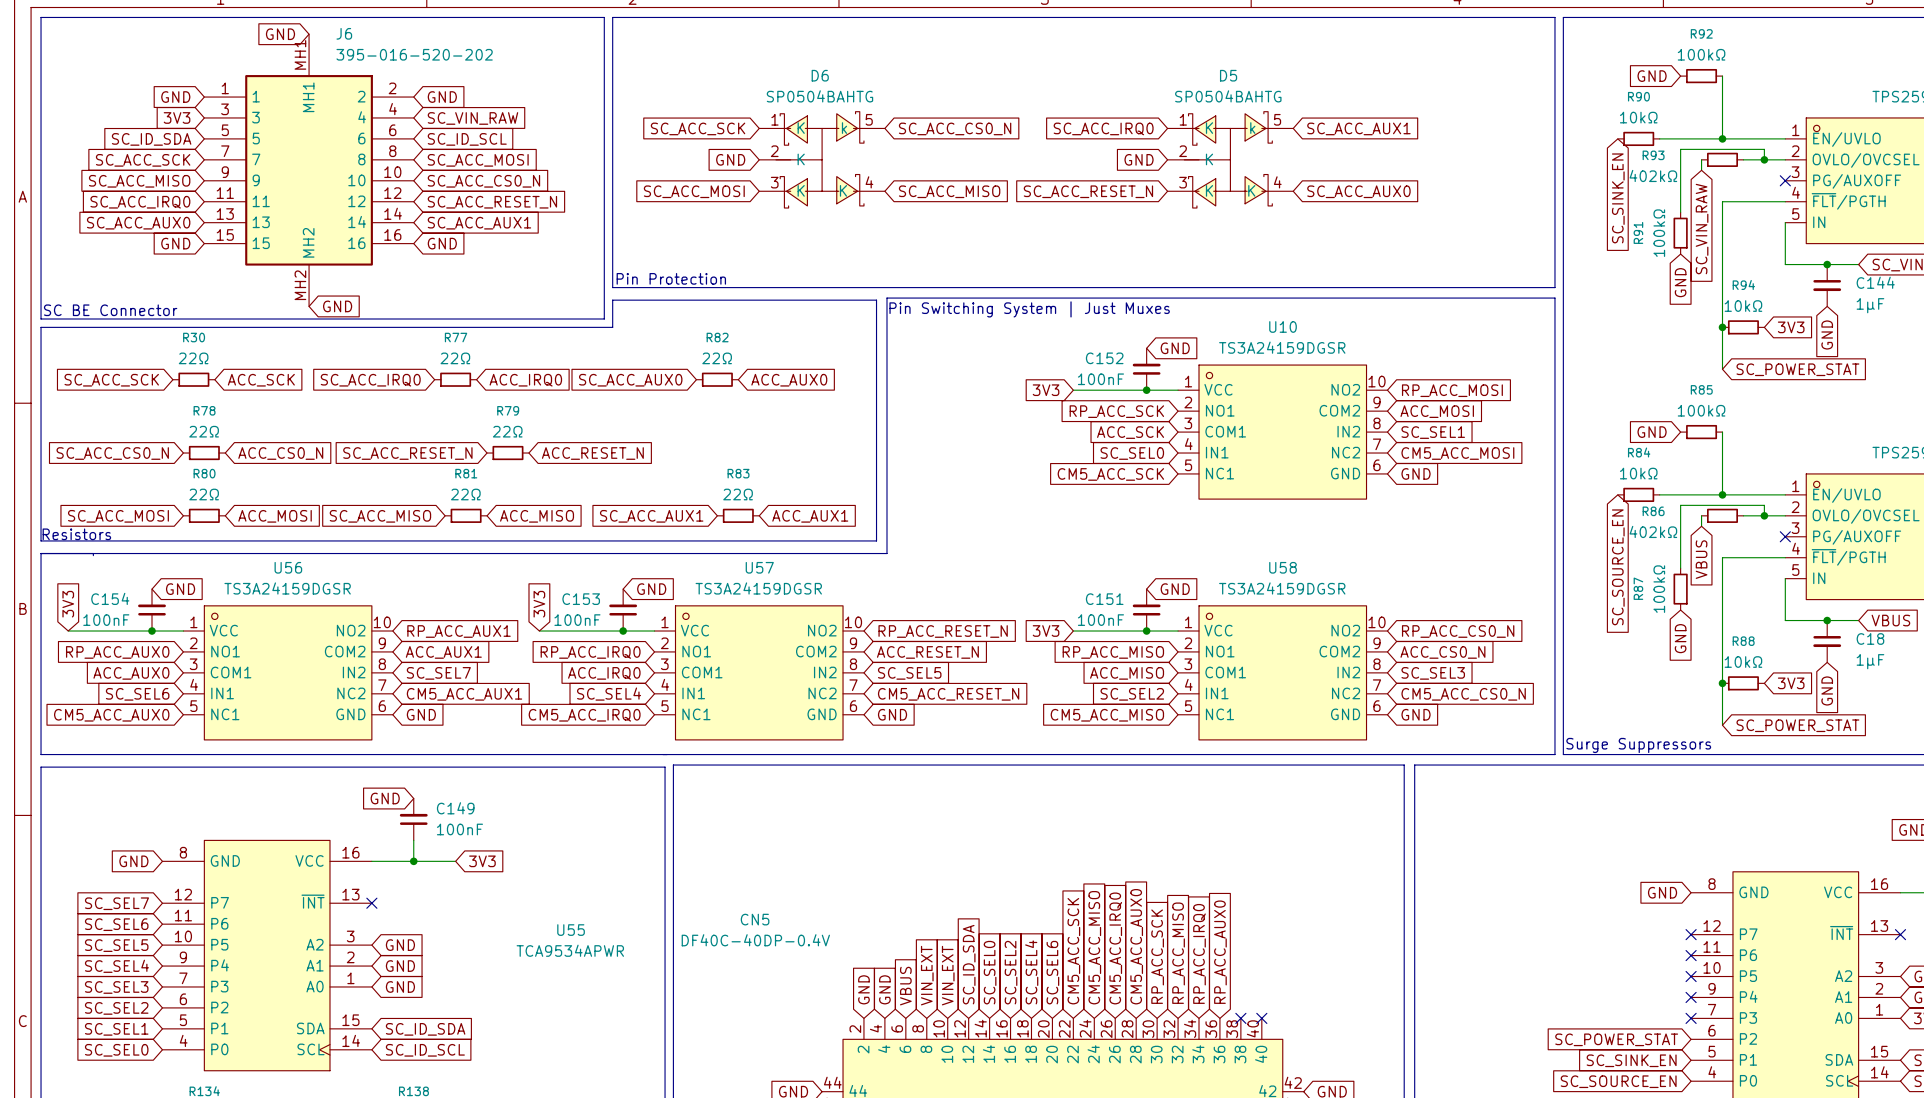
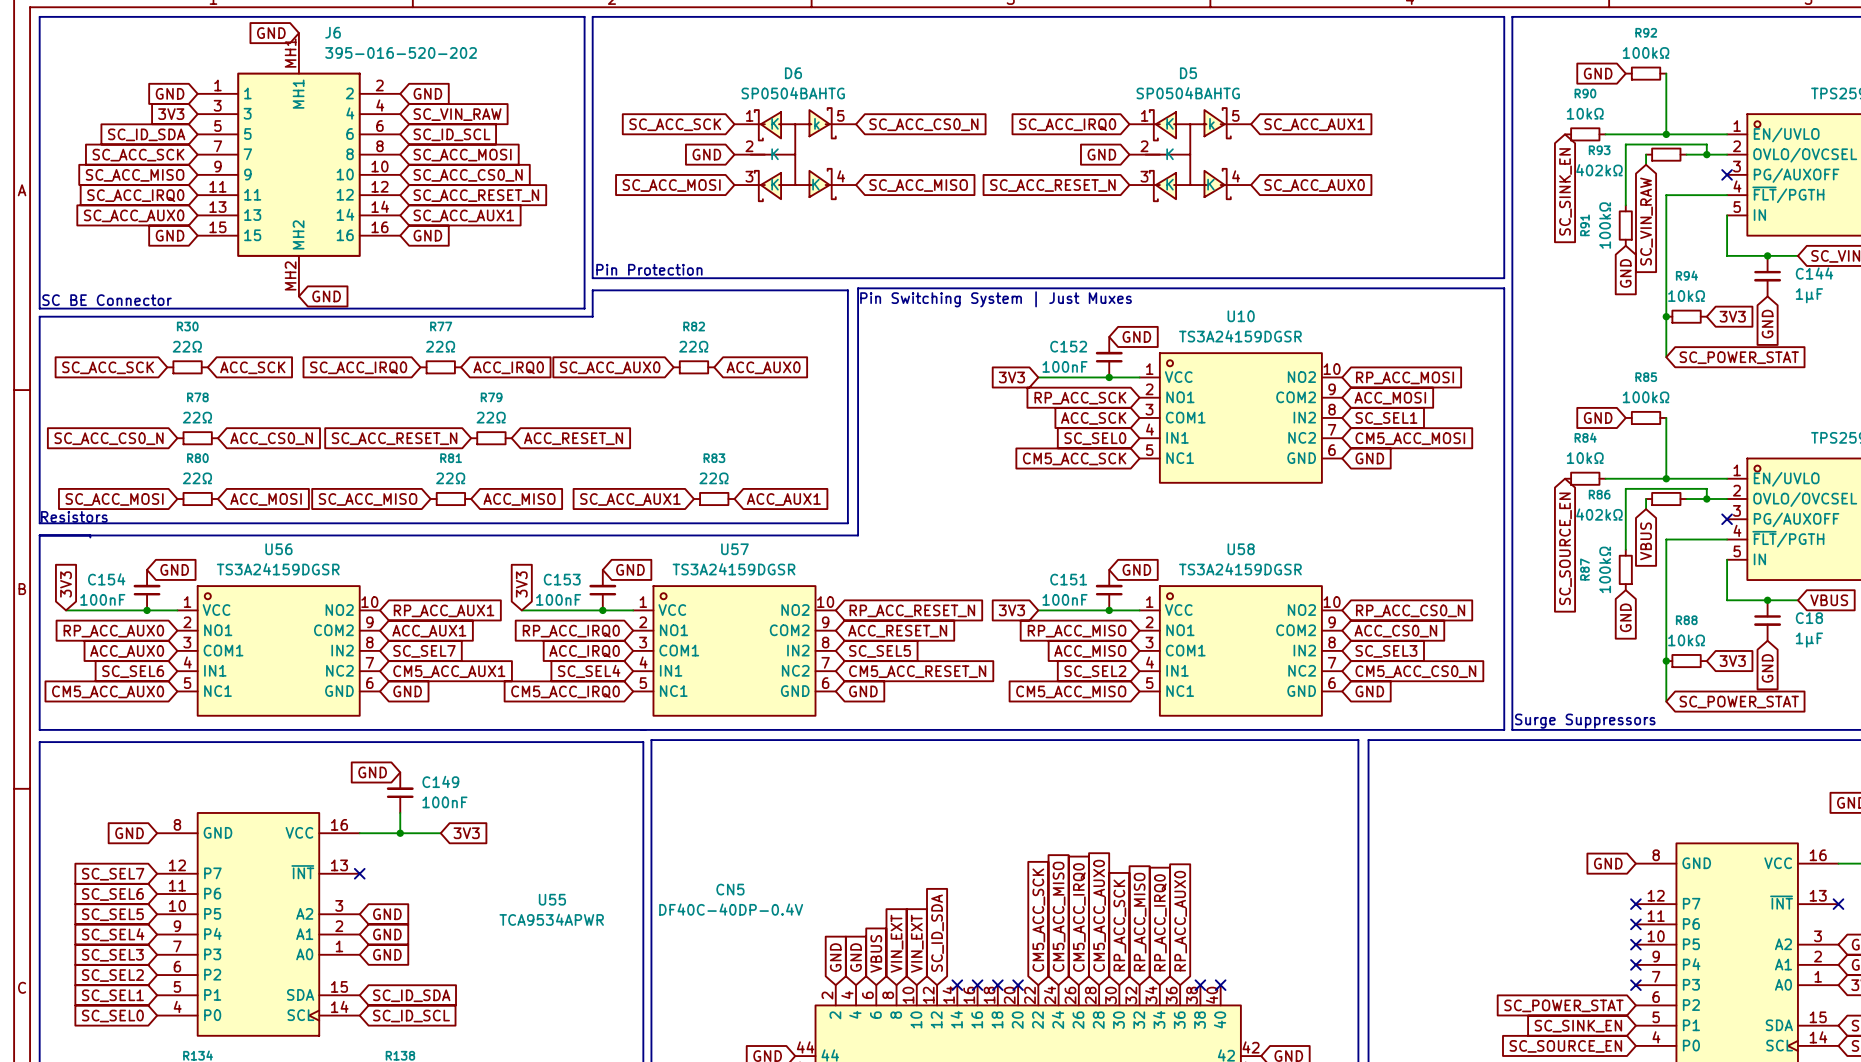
global label: SC_SEL0 (990, 972) -> none
global label: SC_SEL2 (1011, 972) -> none
global label: SC_SEL4 (1031, 972) -> none
global label: SC_SEL6 (1052, 972) -> none
no-connect mark: none -> (957, 985)
no-connect mark: none -> (977, 985)
no-connect mark: none -> (997, 985)
no-connect mark: none -> (1018, 985)

